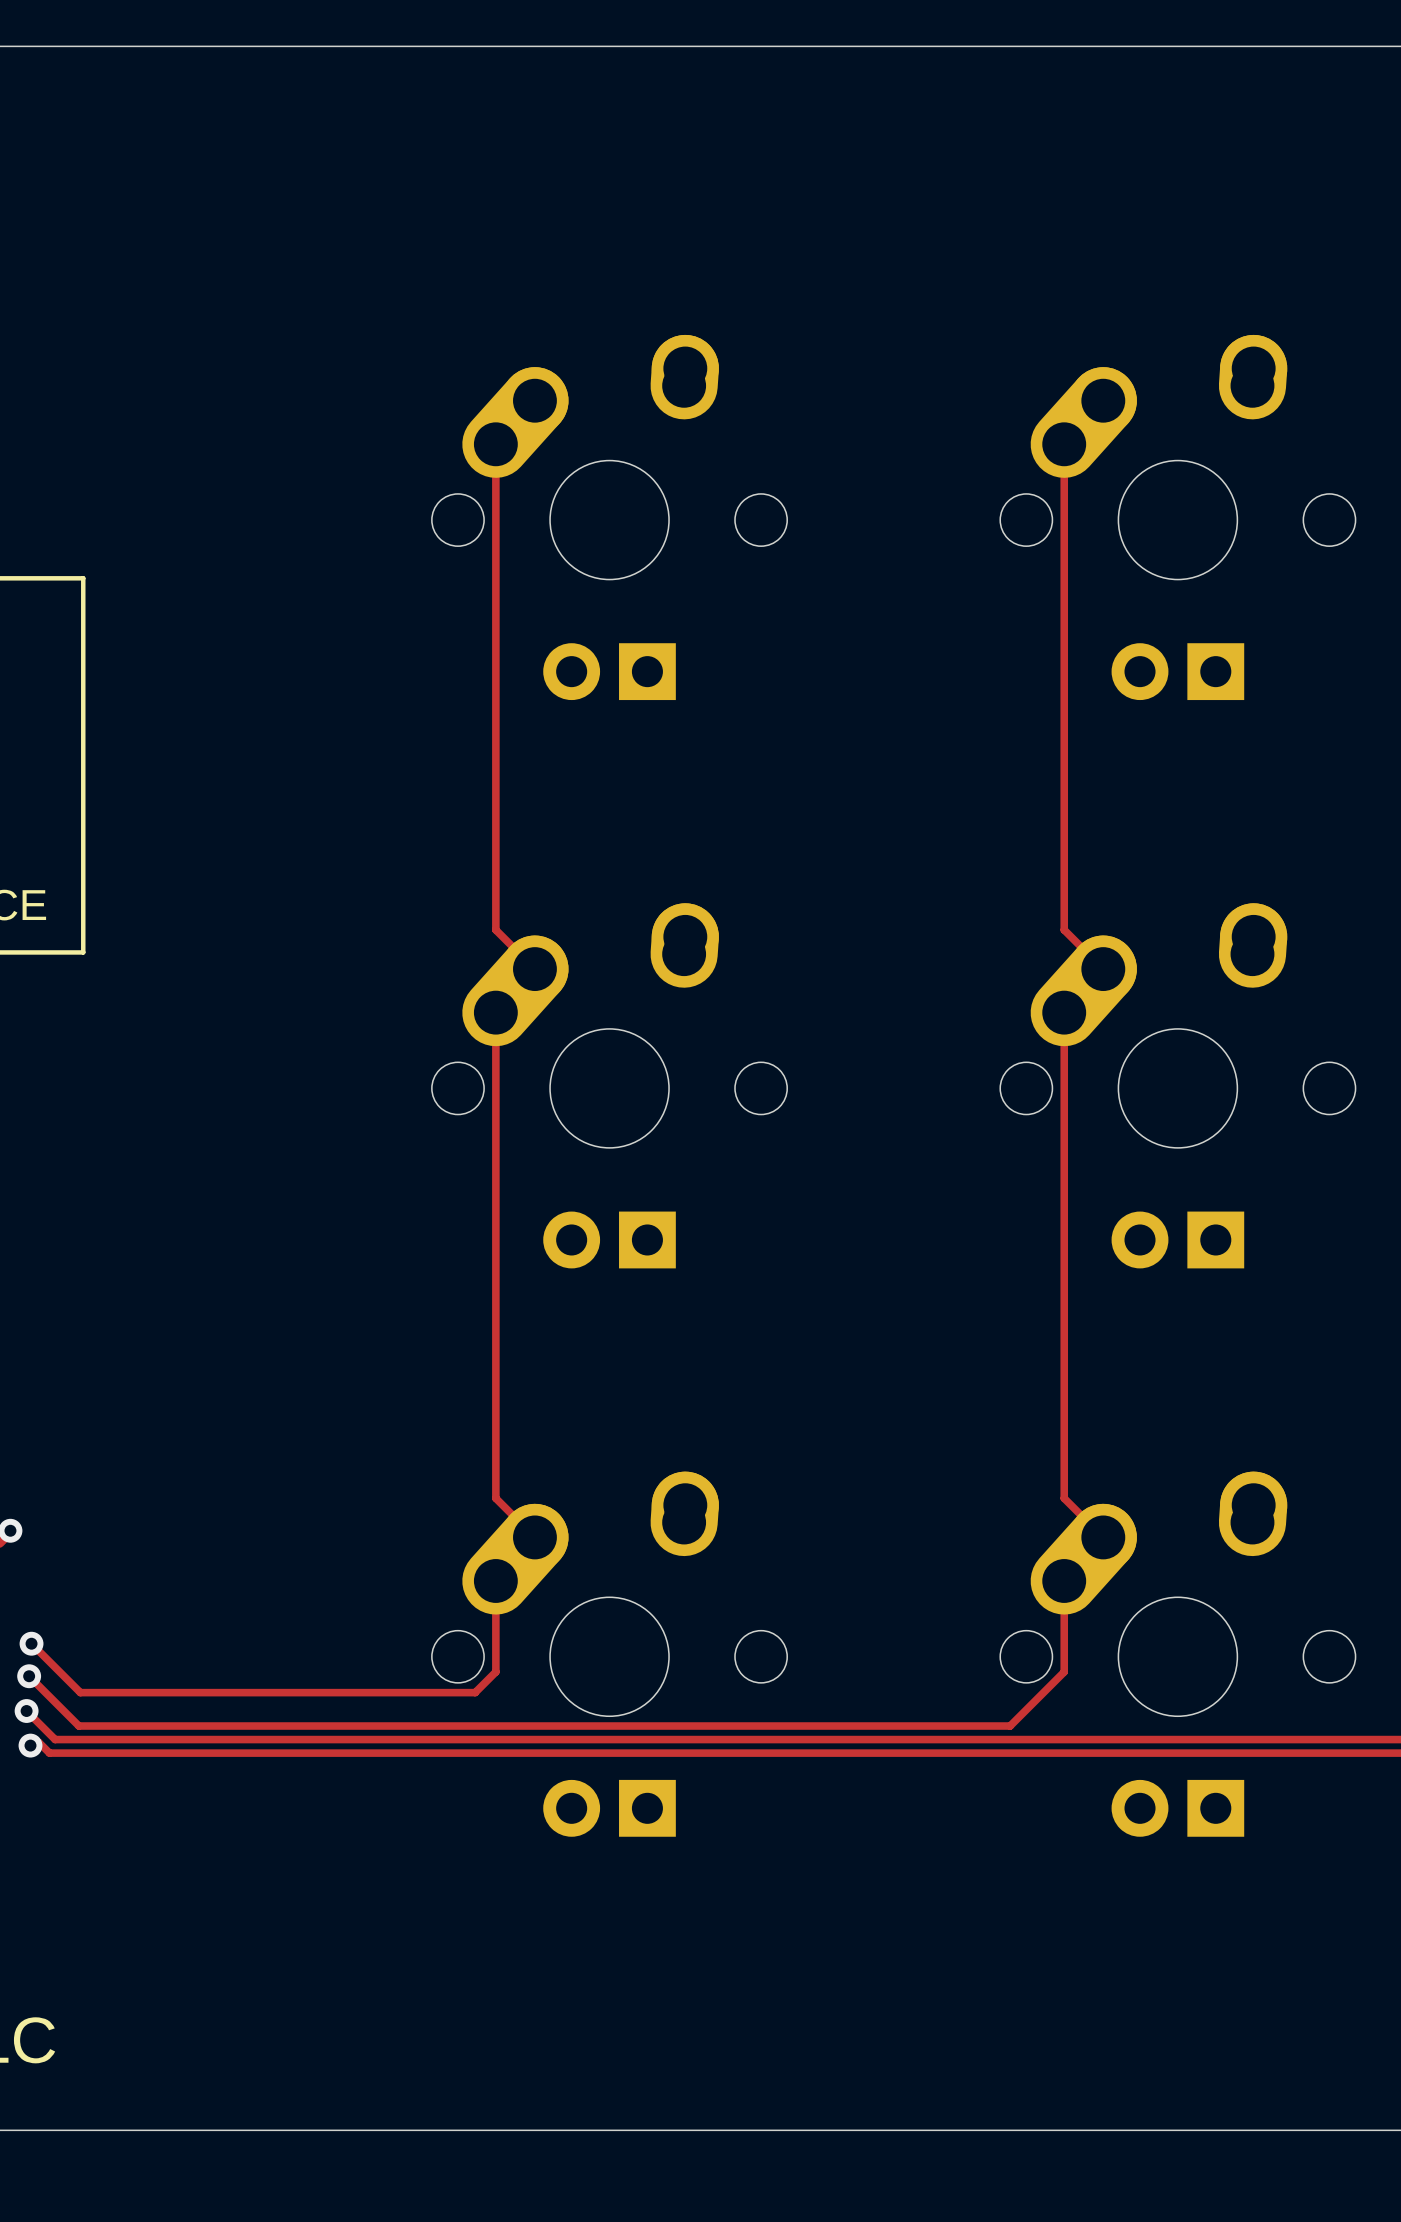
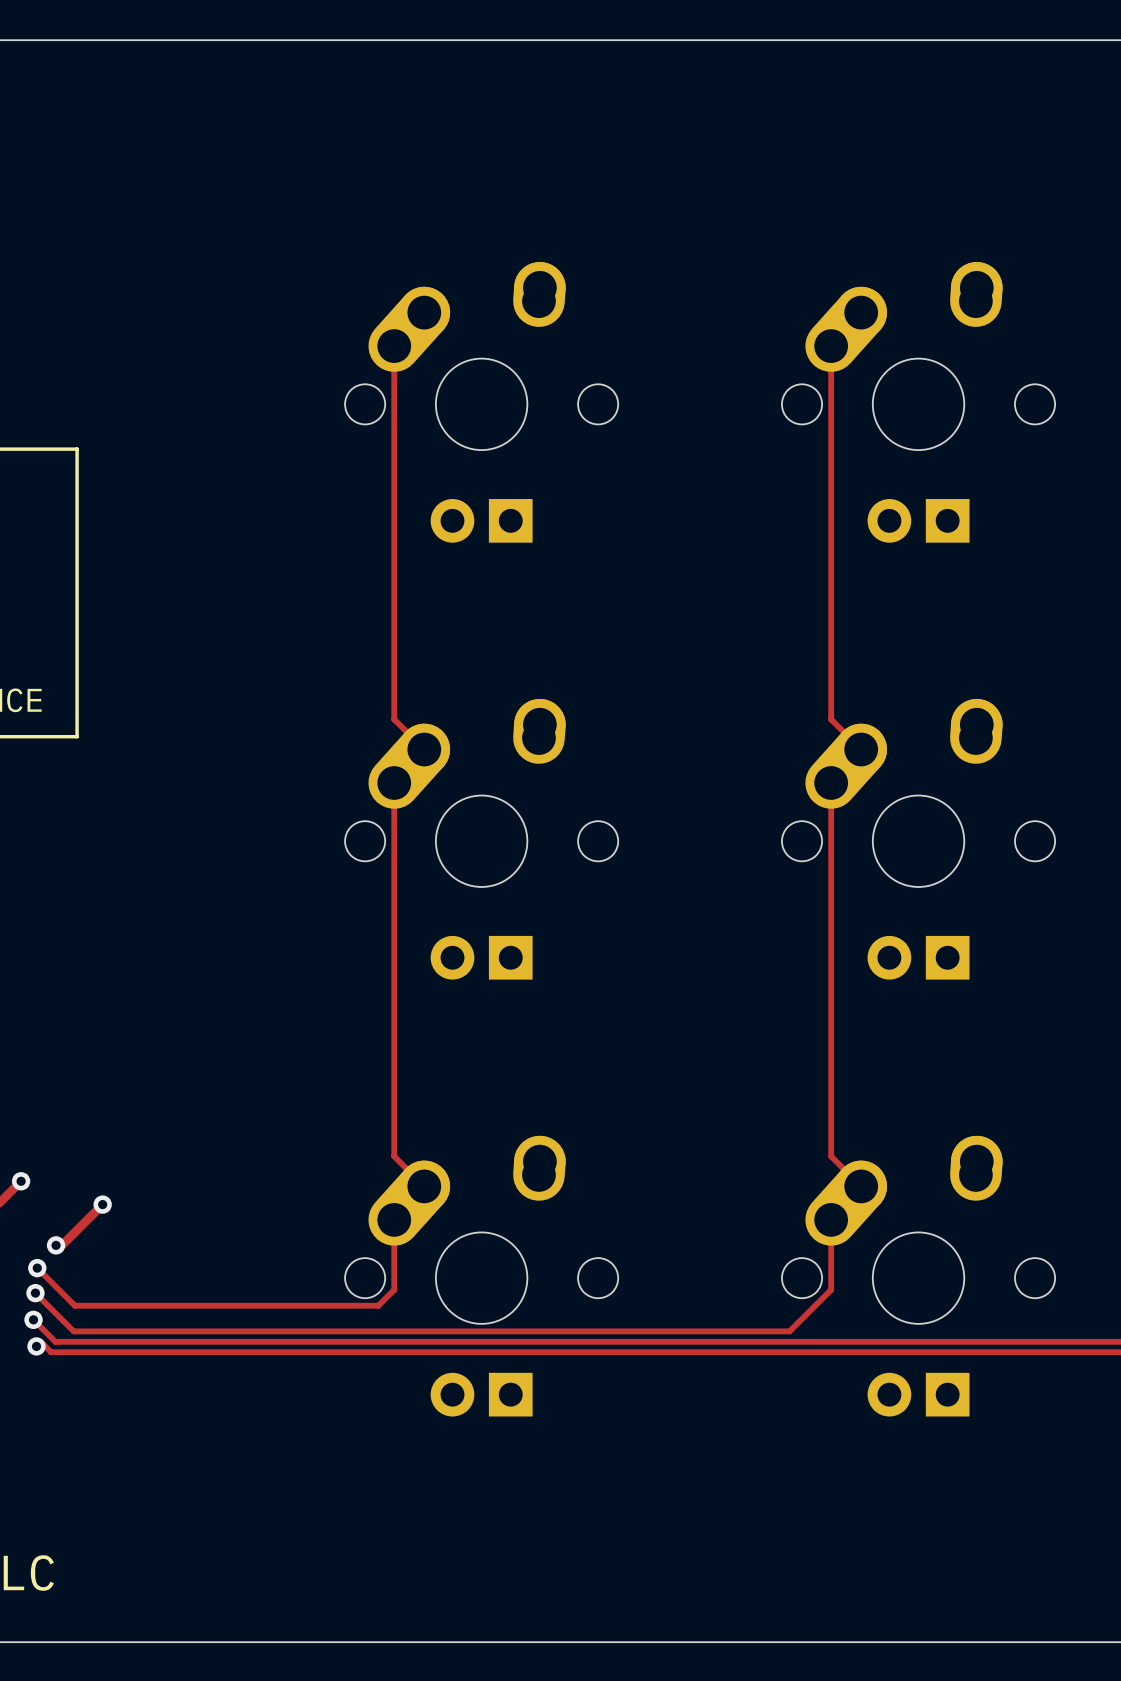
track: none -> (102, 1204) (61, 1245) (56, 1245)
via: none -> (102, 1204)
via: none -> (56, 1245)

